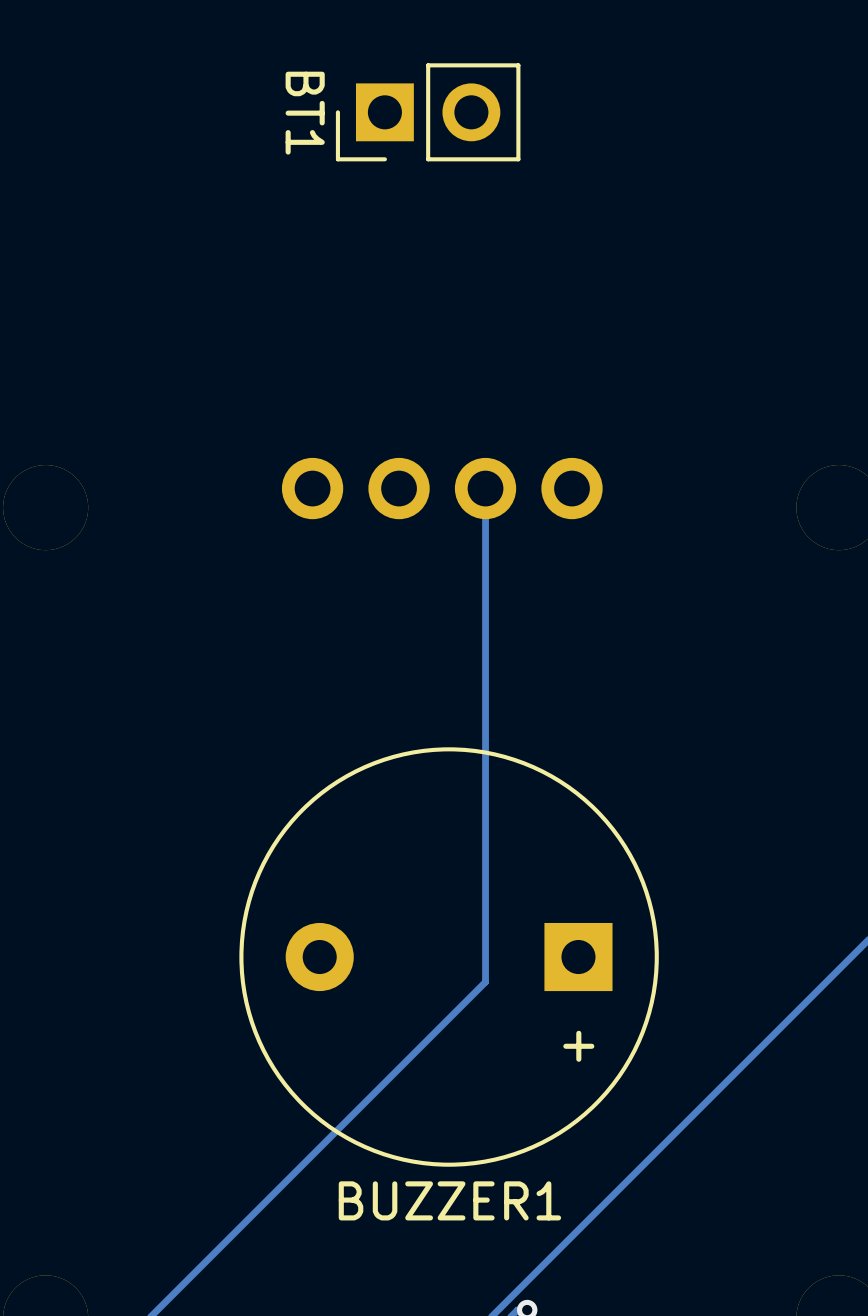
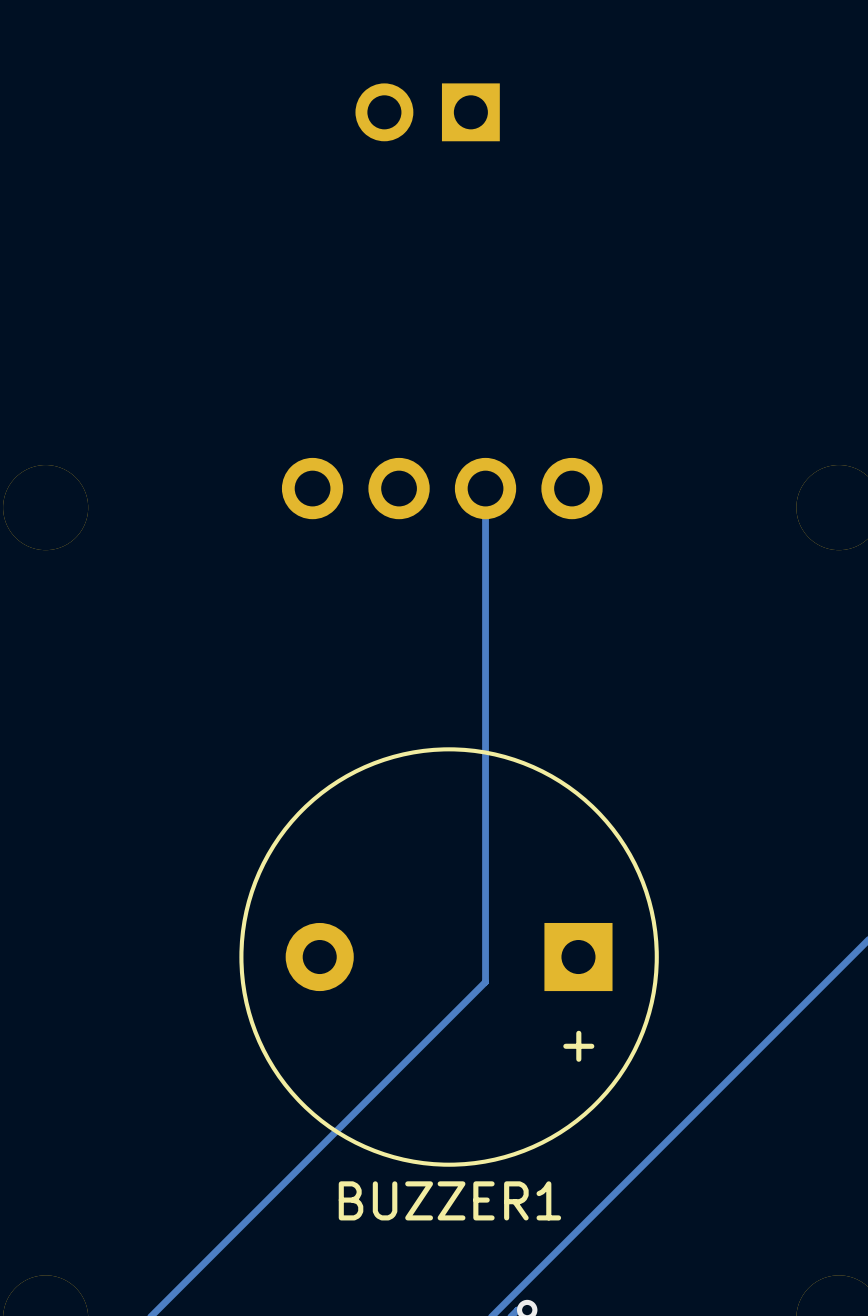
BT1 side: bottom (428, 112) -> top (427, 112)

